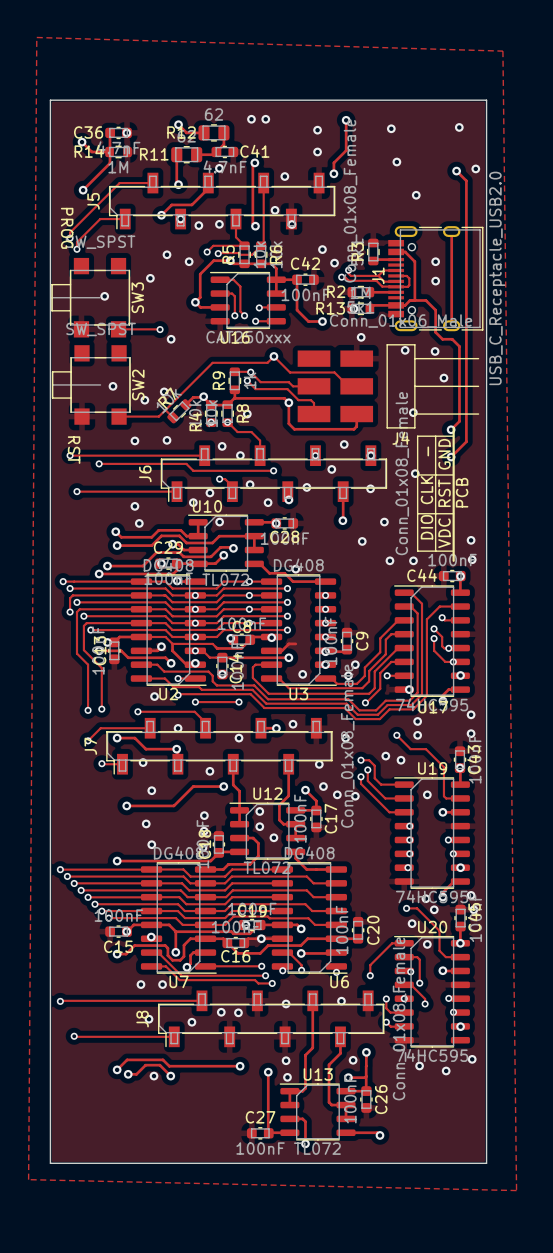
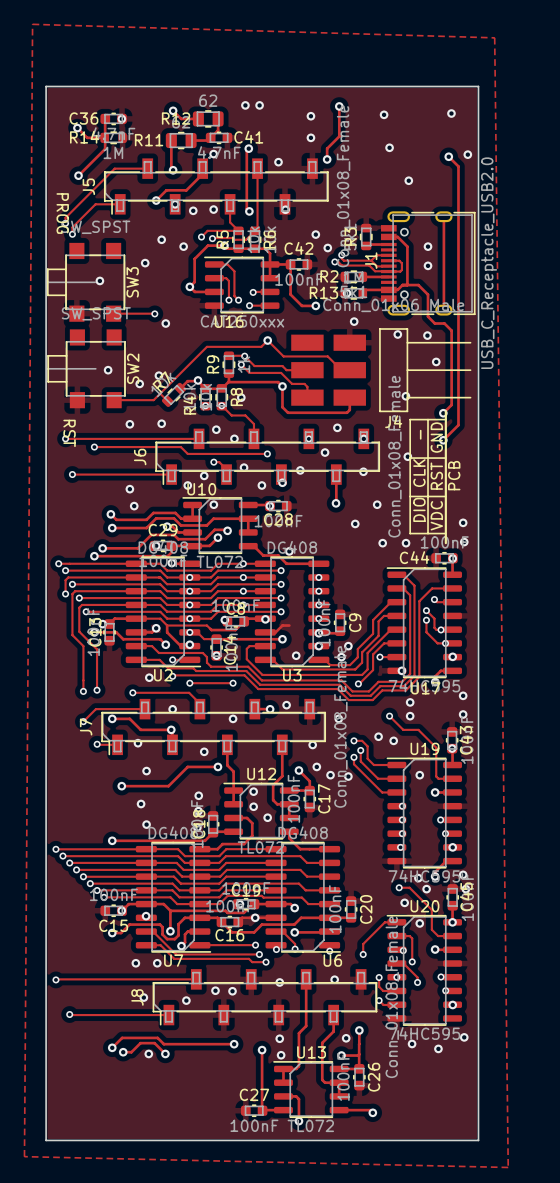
via: (275, 210) -> none

